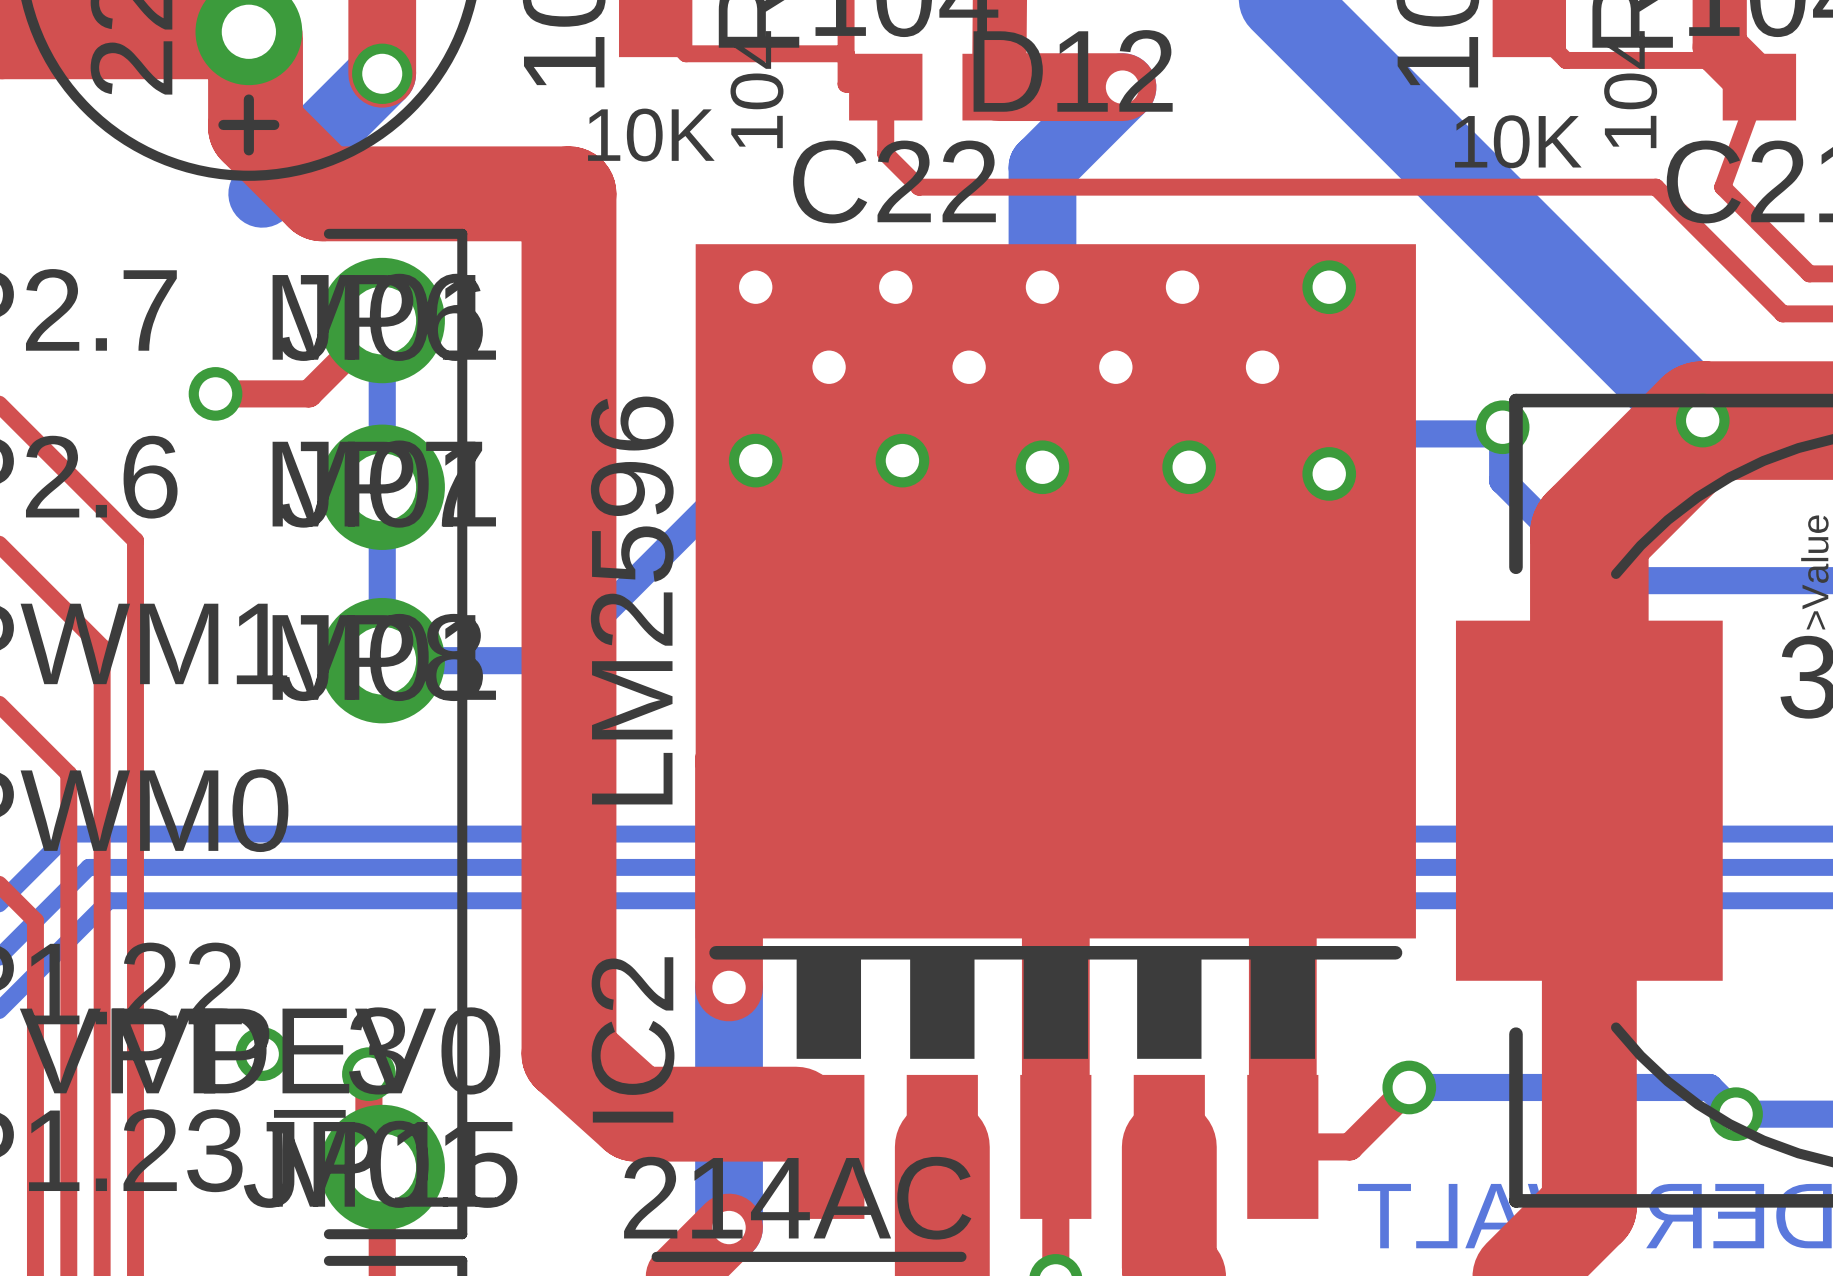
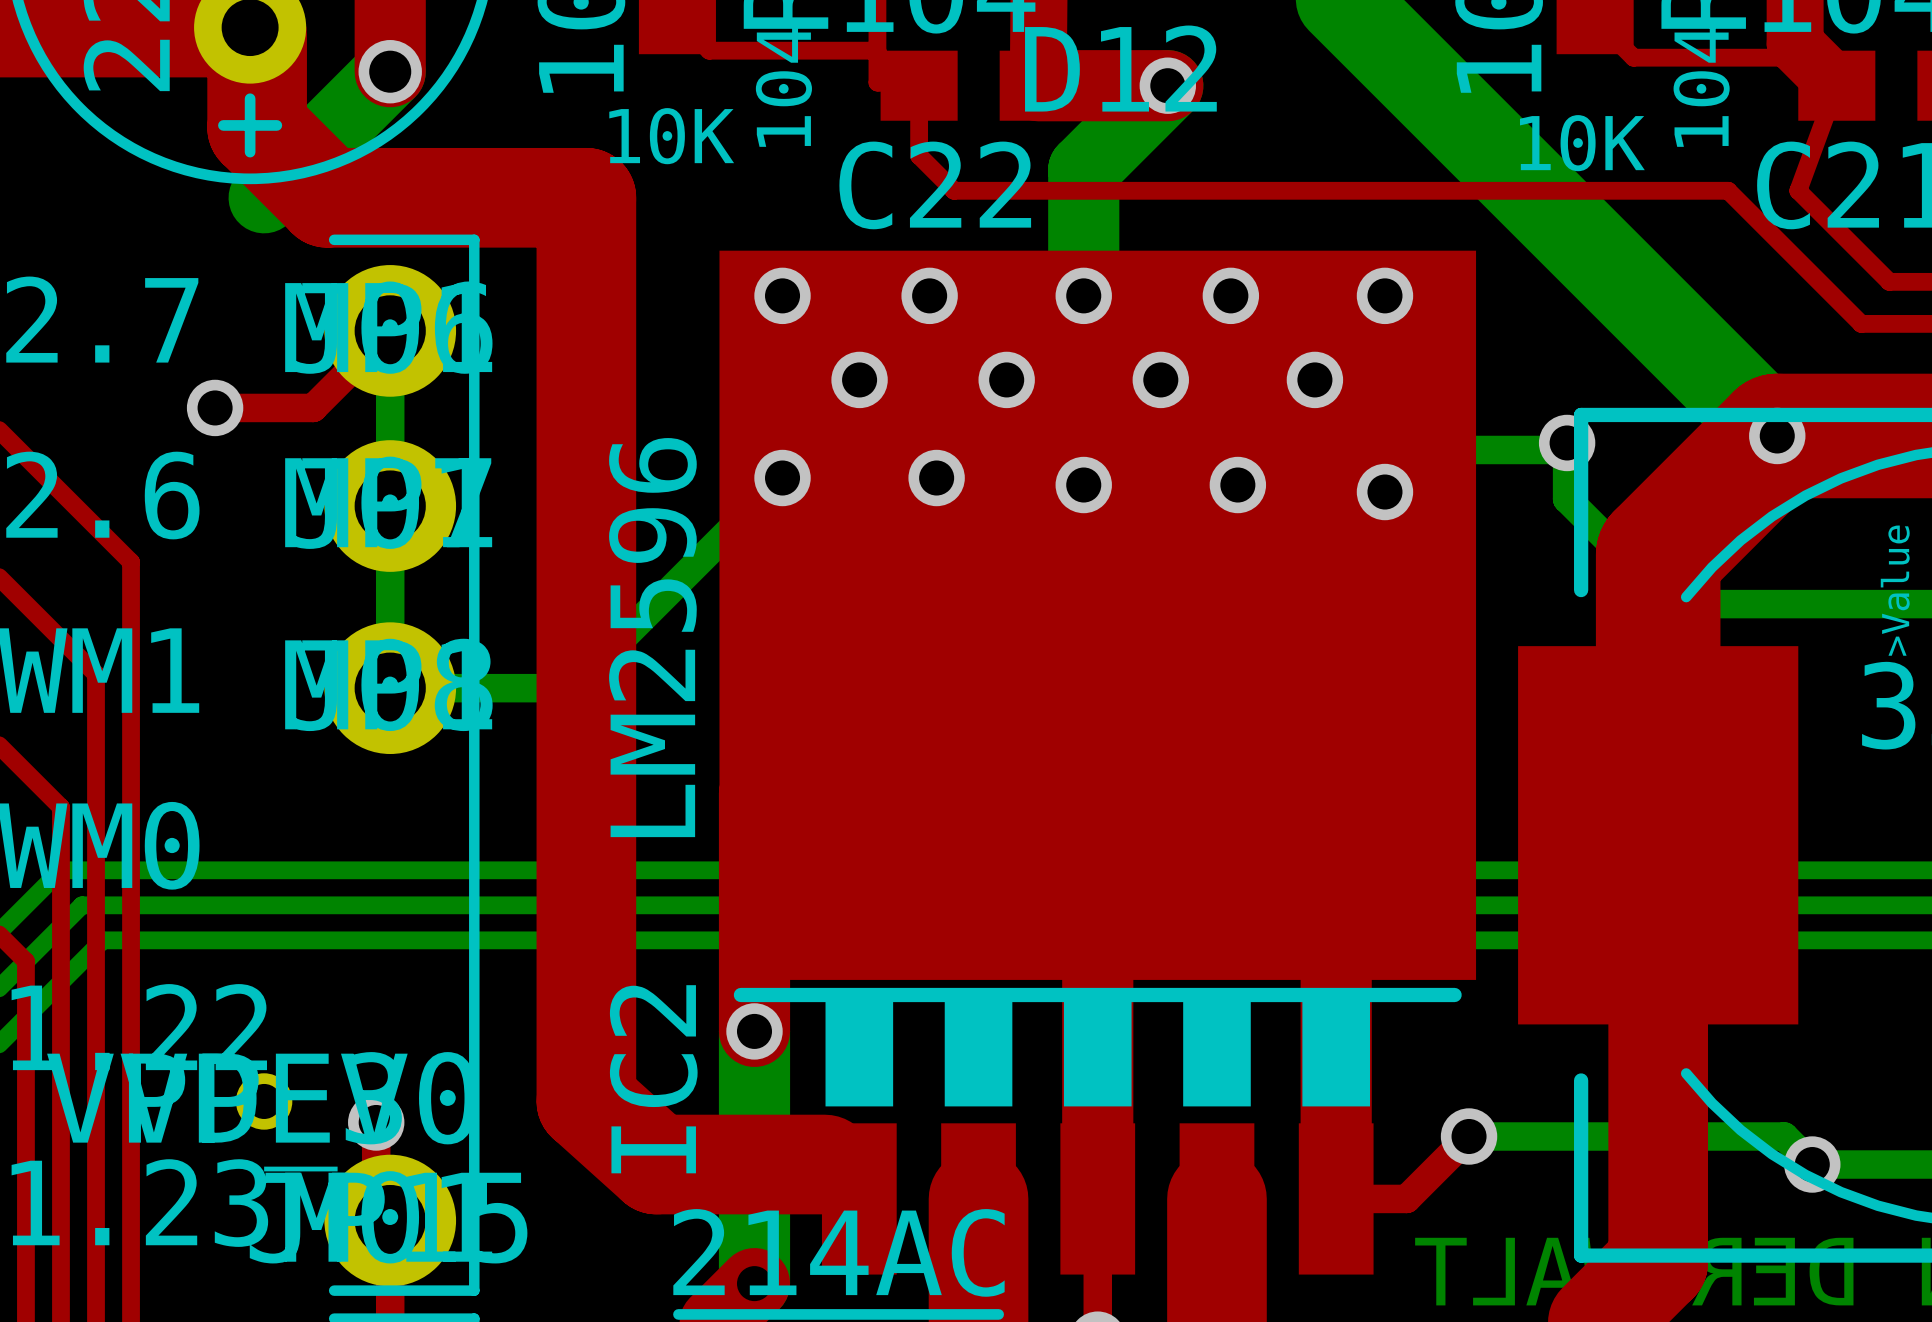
via size: [1105, 70, 1140, 104] -> [1139, 57, 1197, 114]
via size: [739, 270, 773, 304] -> [754, 267, 811, 325]
via size: [879, 270, 913, 304] -> [901, 267, 958, 325]
via size: [1025, 270, 1060, 304] -> [1055, 267, 1112, 325]
via size: [1165, 270, 1200, 304] -> [1202, 267, 1260, 325]
via size: [812, 350, 846, 384] -> [831, 351, 888, 409]
via size: [952, 350, 986, 384] -> [978, 351, 1035, 409]
via size: [1099, 350, 1133, 384] -> [1132, 351, 1189, 409]
via size: [1245, 350, 1280, 384] -> [1286, 351, 1344, 409]
via size: [712, 970, 746, 1005] -> [726, 1003, 783, 1060]

